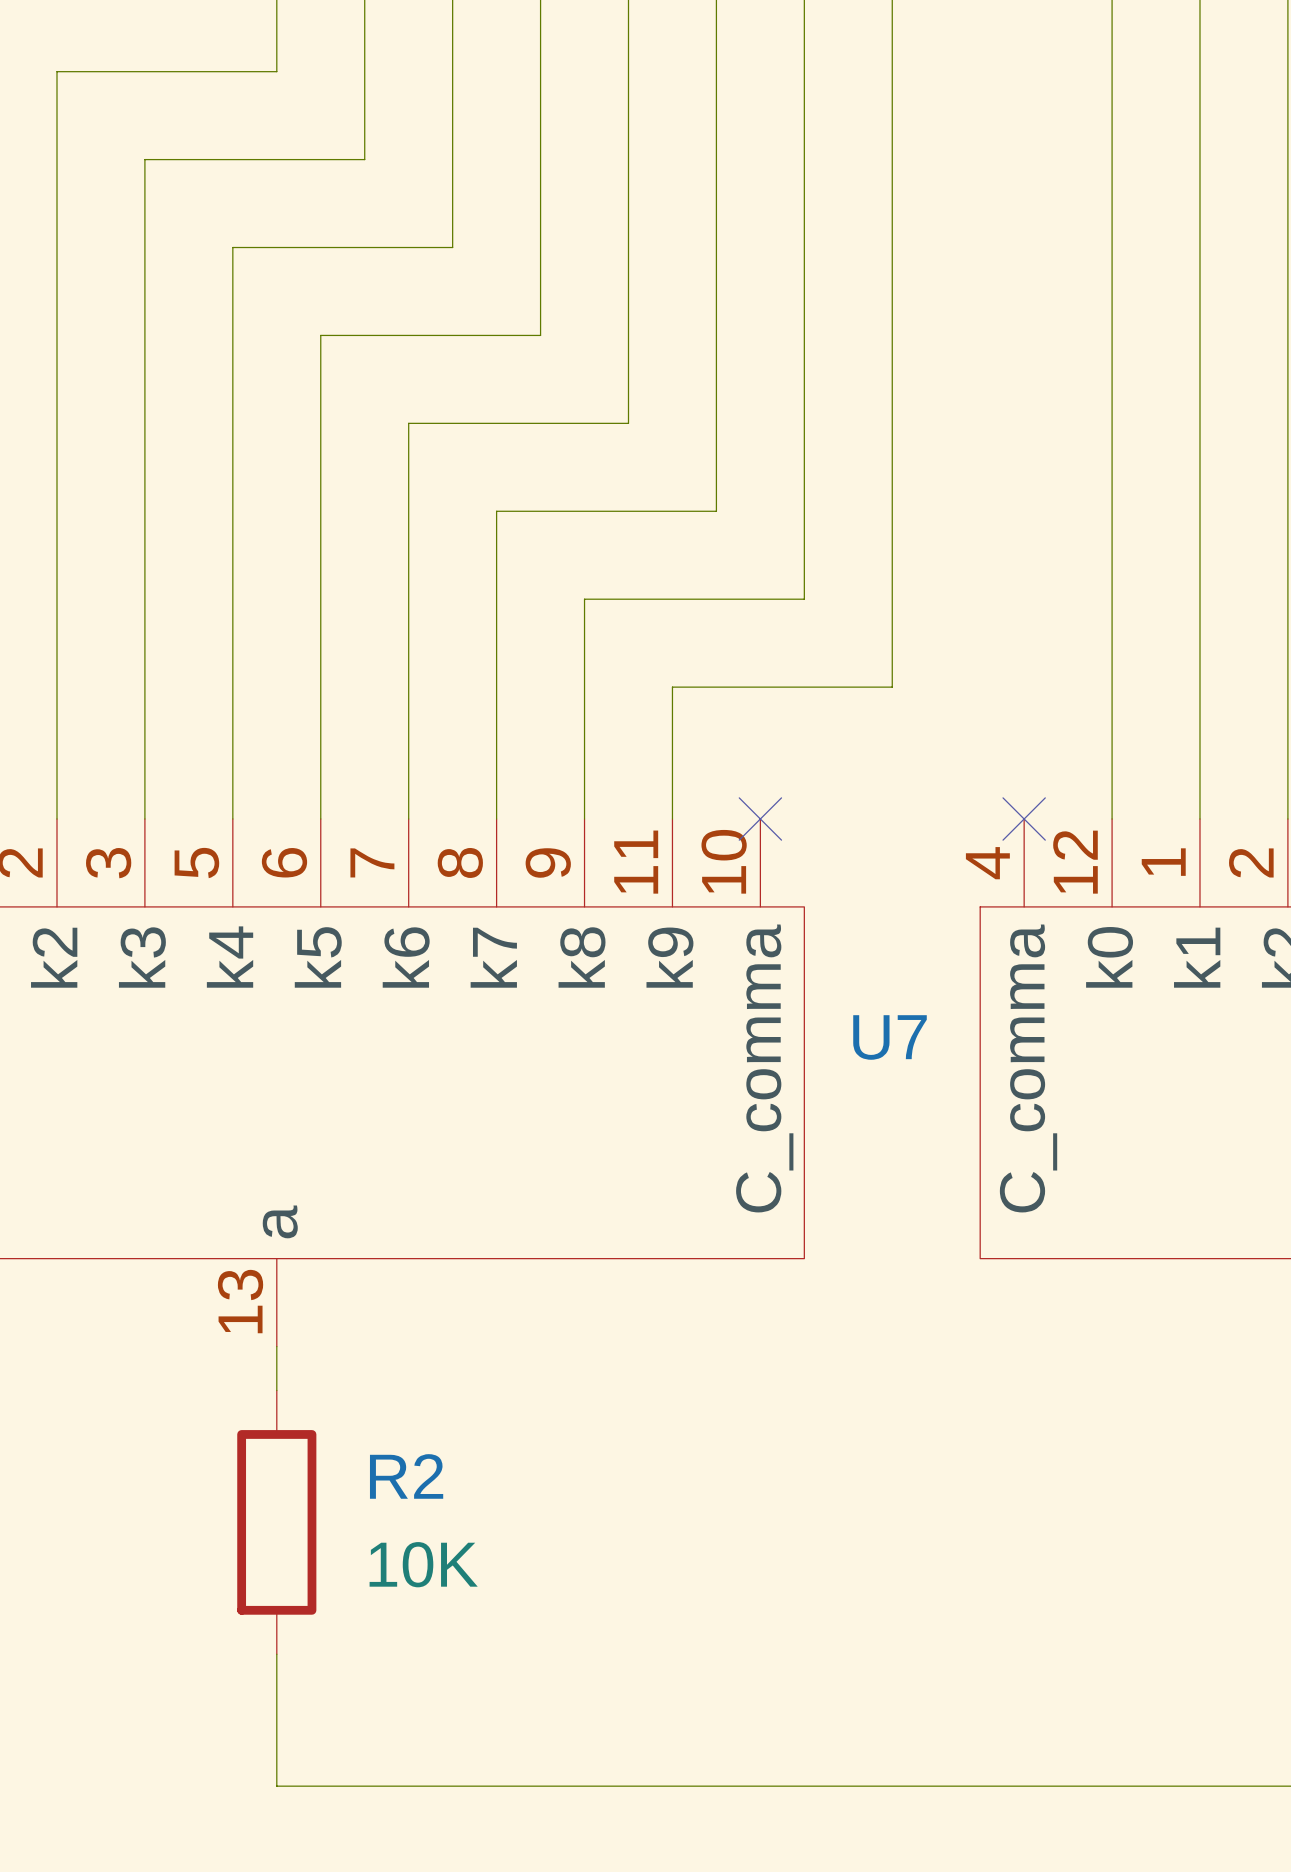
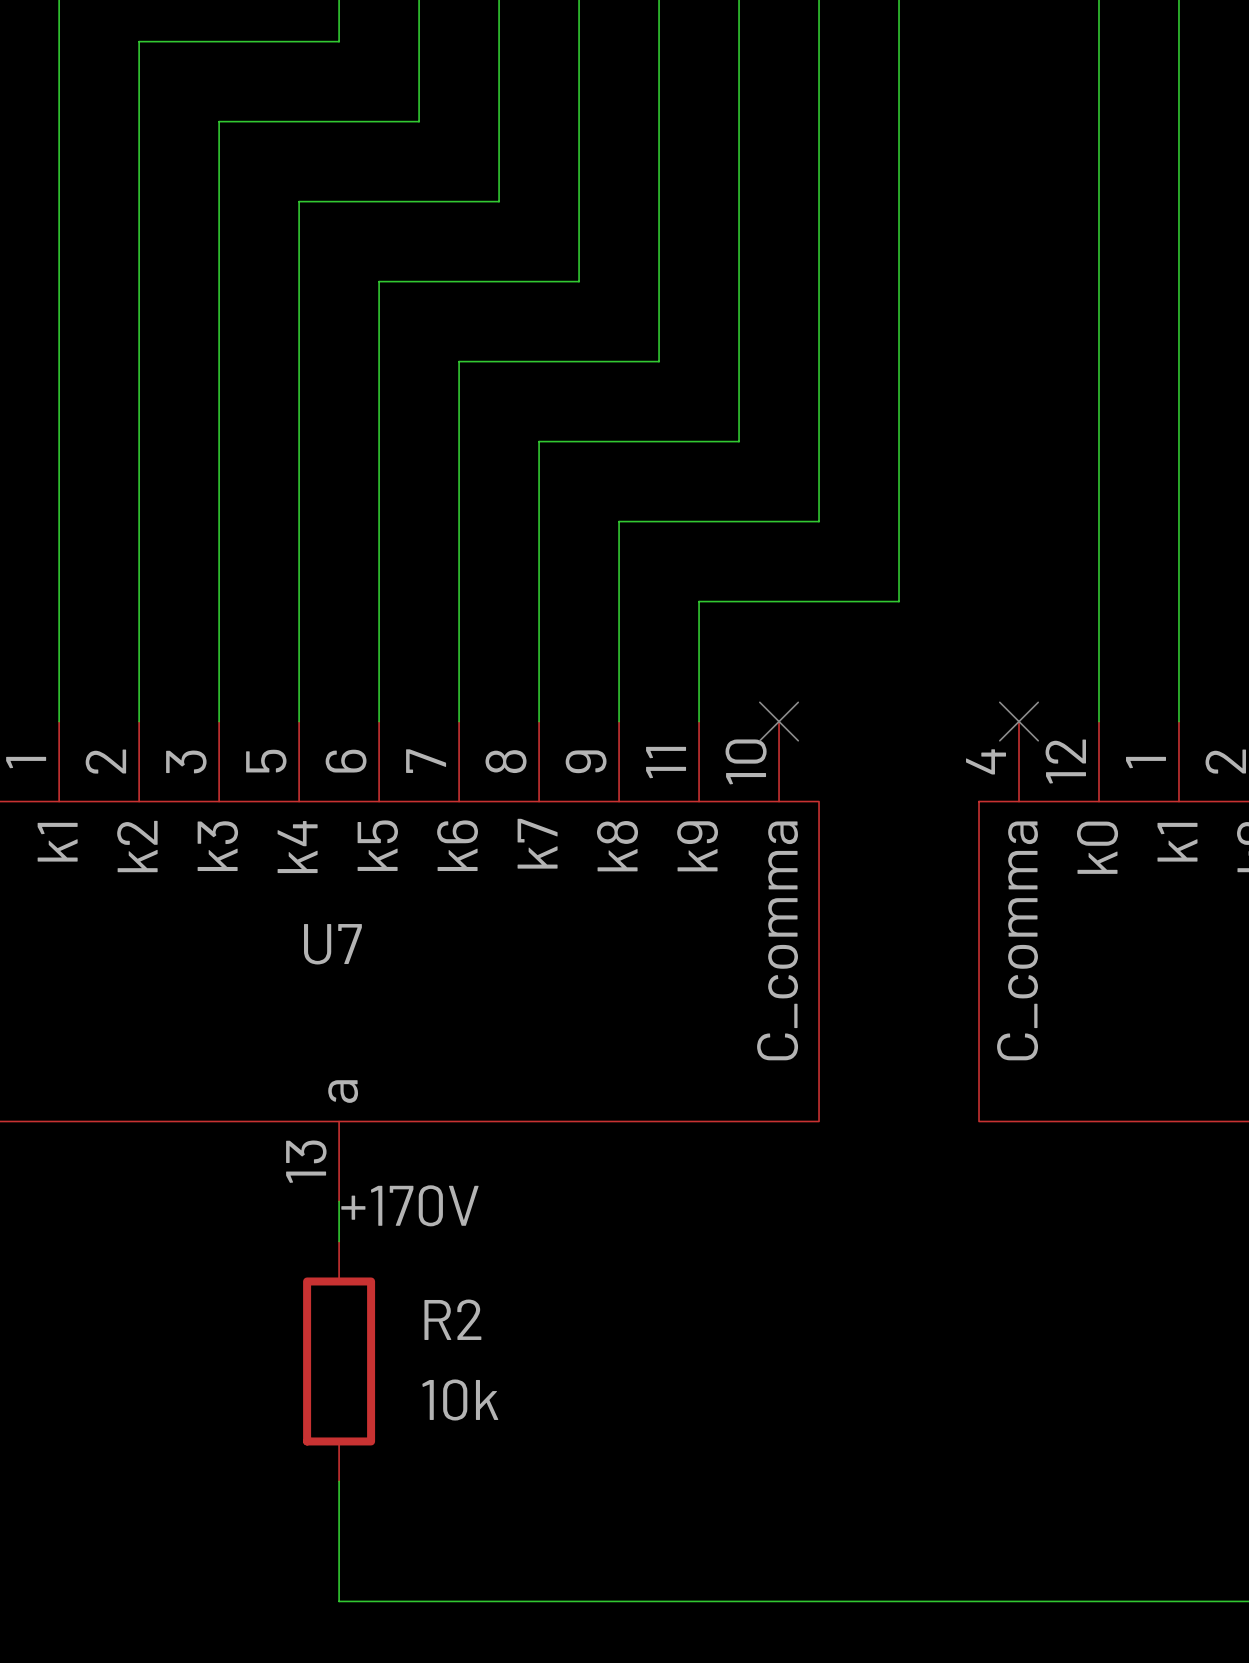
U7 name position: U7 (890, 1037) -> U7 (332, 944)
label: none -> +170V (410, 1205)
R2 value: 10K (423, 1564) -> 10k (460, 1399)

